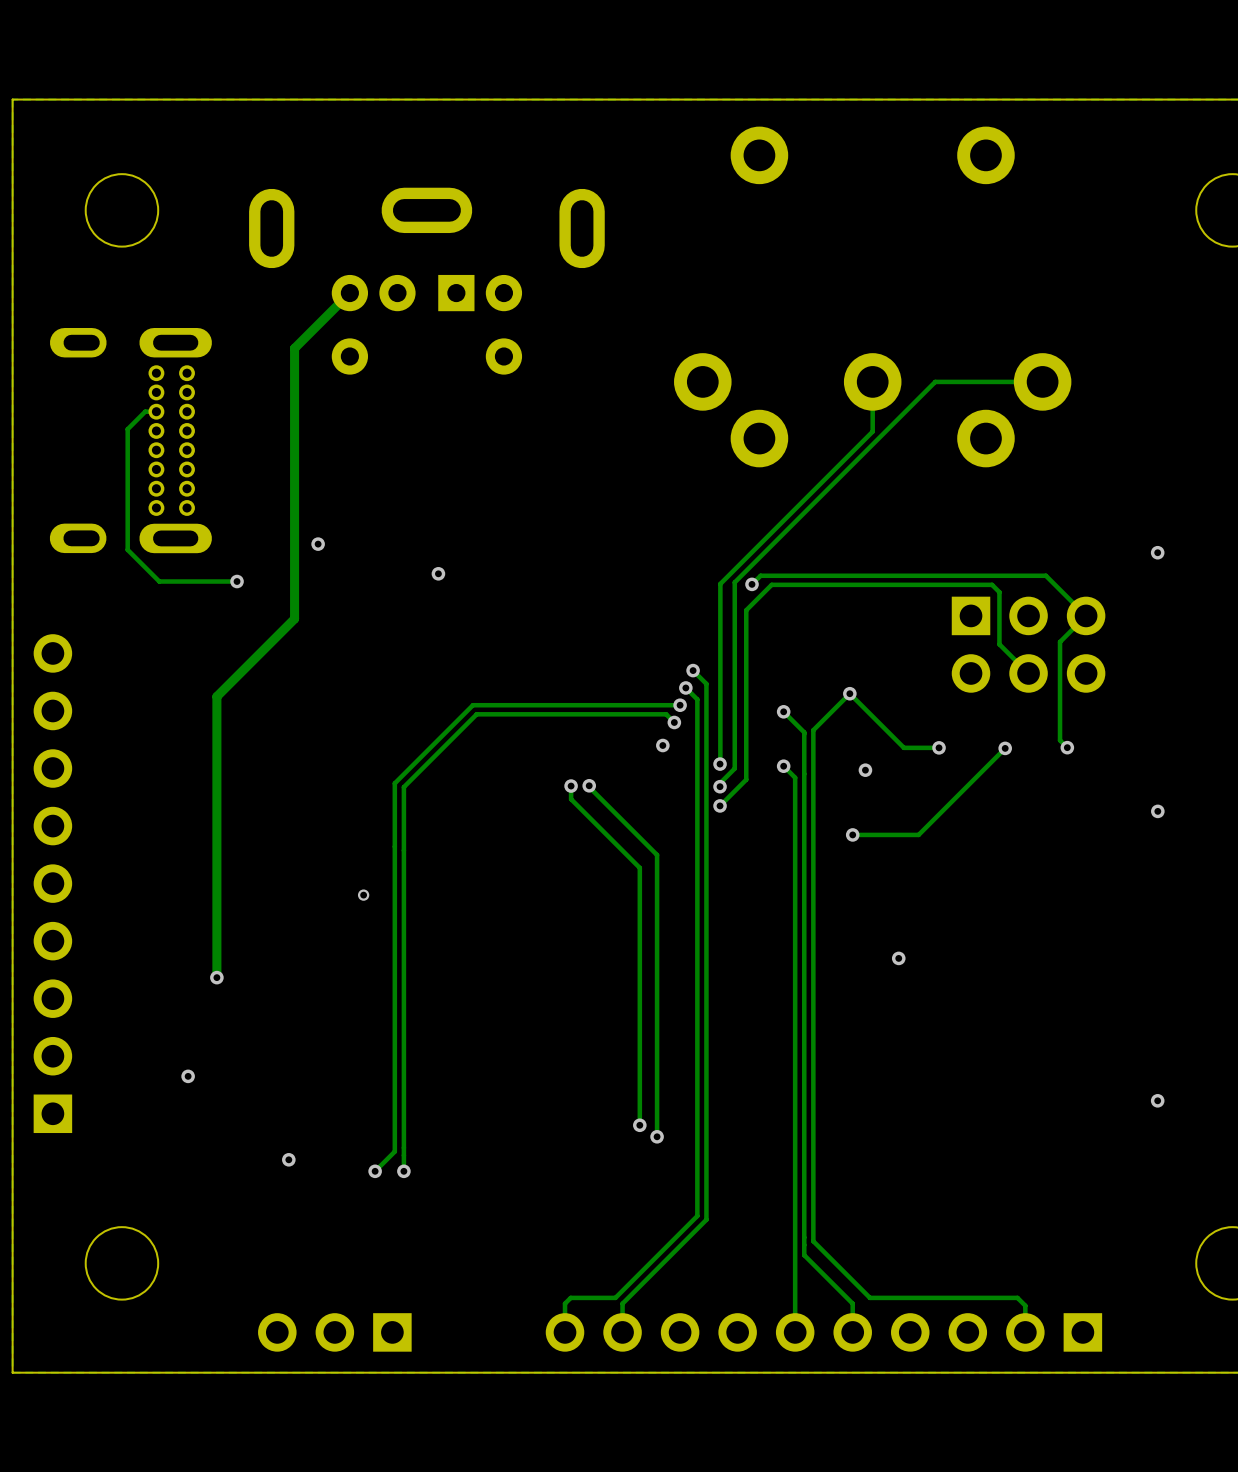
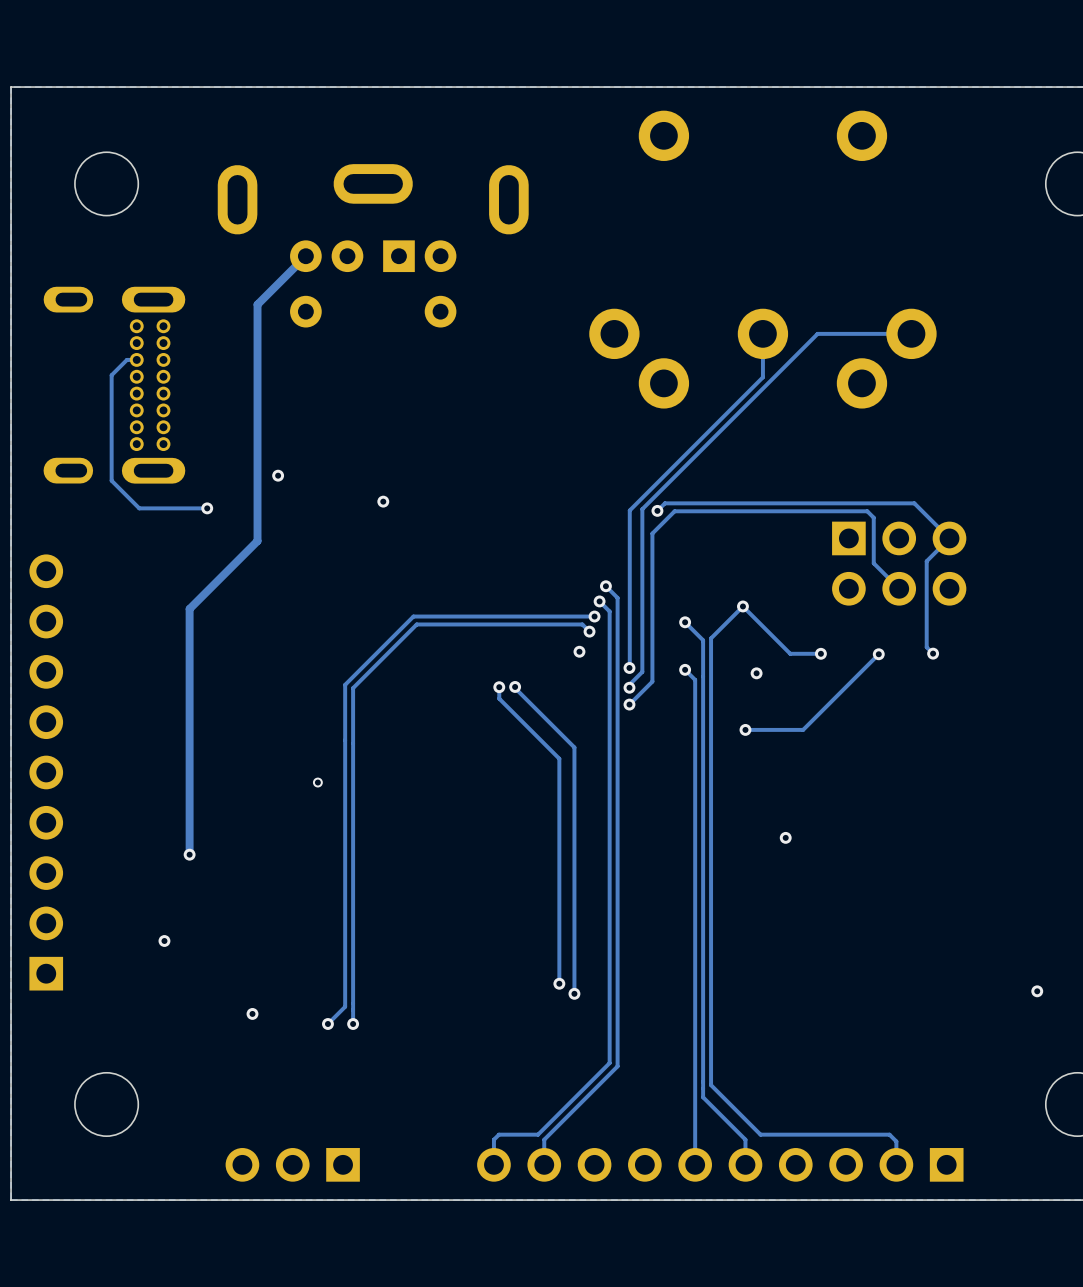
via: (1157, 552) -> none
via: (1157, 811) -> none
via position: (1157, 1100) -> (1037, 991)

